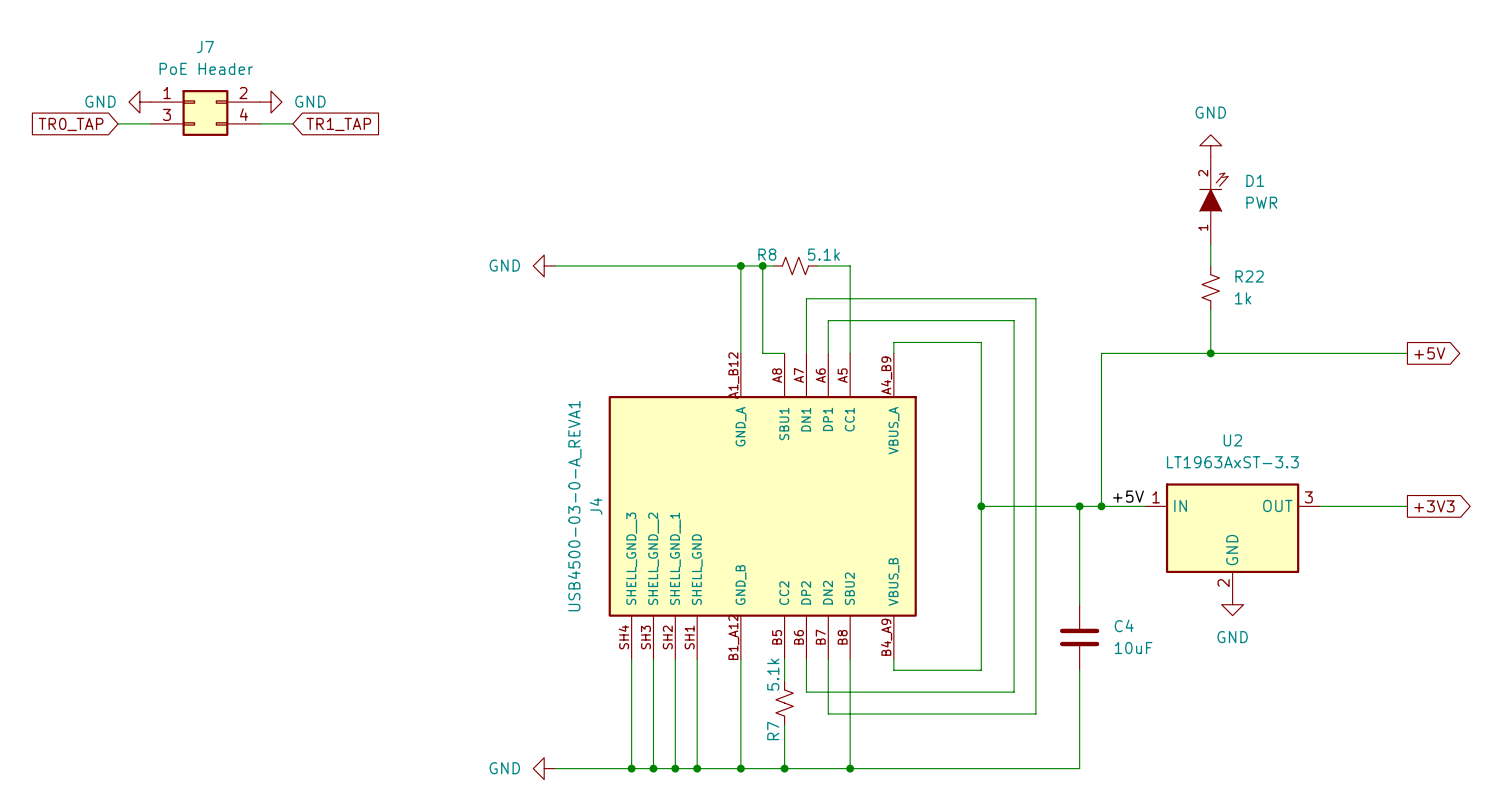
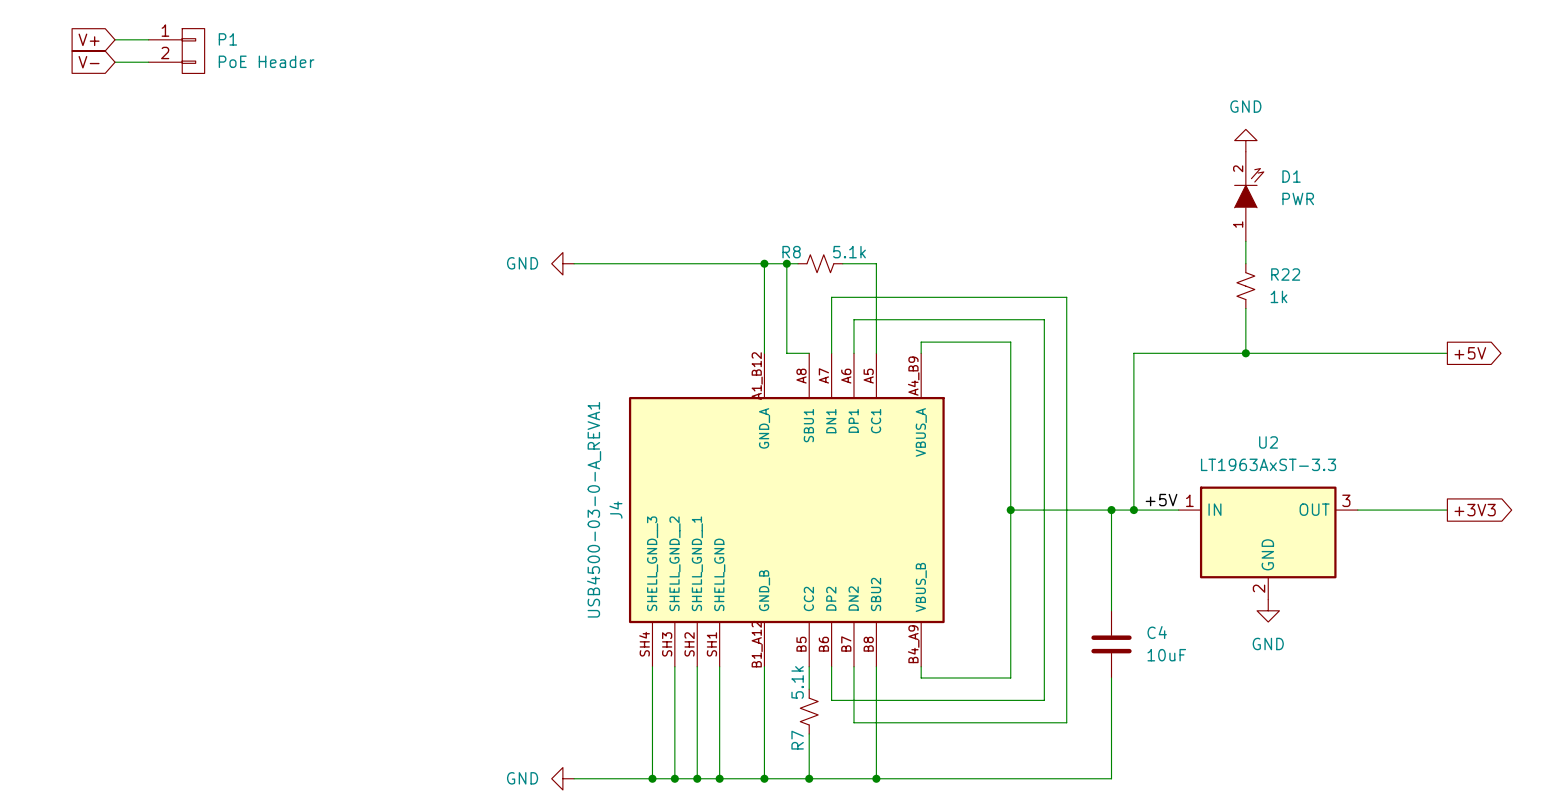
global label: none -> V+ (89, 39)
P1: none -> PoE Header (176, 51)
global label: none -> V- (89, 62)
power symbol: GND (139, 102) -> none
power symbol: GND (271, 102) -> none
J7: PoE Header (205, 112) -> none
wire: (118, 123) (150, 123) -> (115, 62) (148, 62)
wire: (260, 123) (292, 123) -> (115, 39) (148, 39)
global label: TR0_TAP (71, 124) -> none
global label: TR1_TAP (338, 124) -> none

